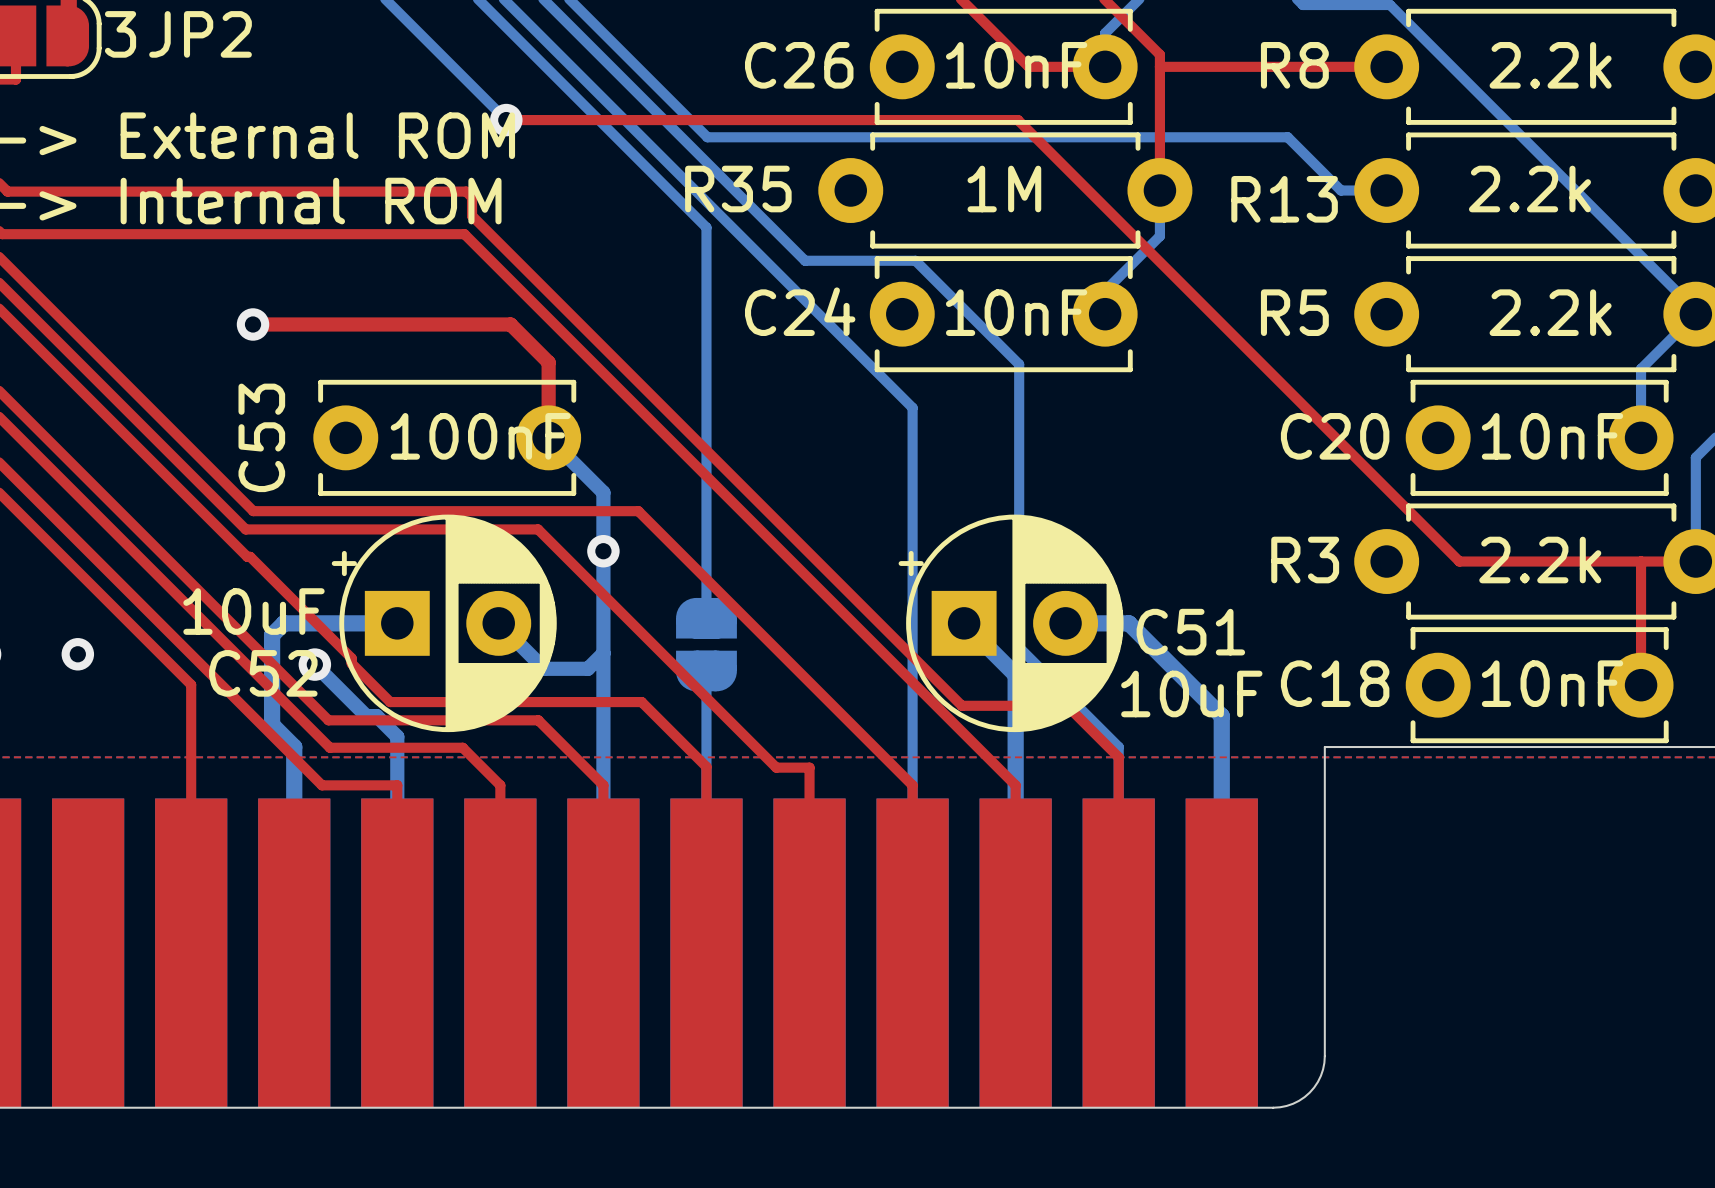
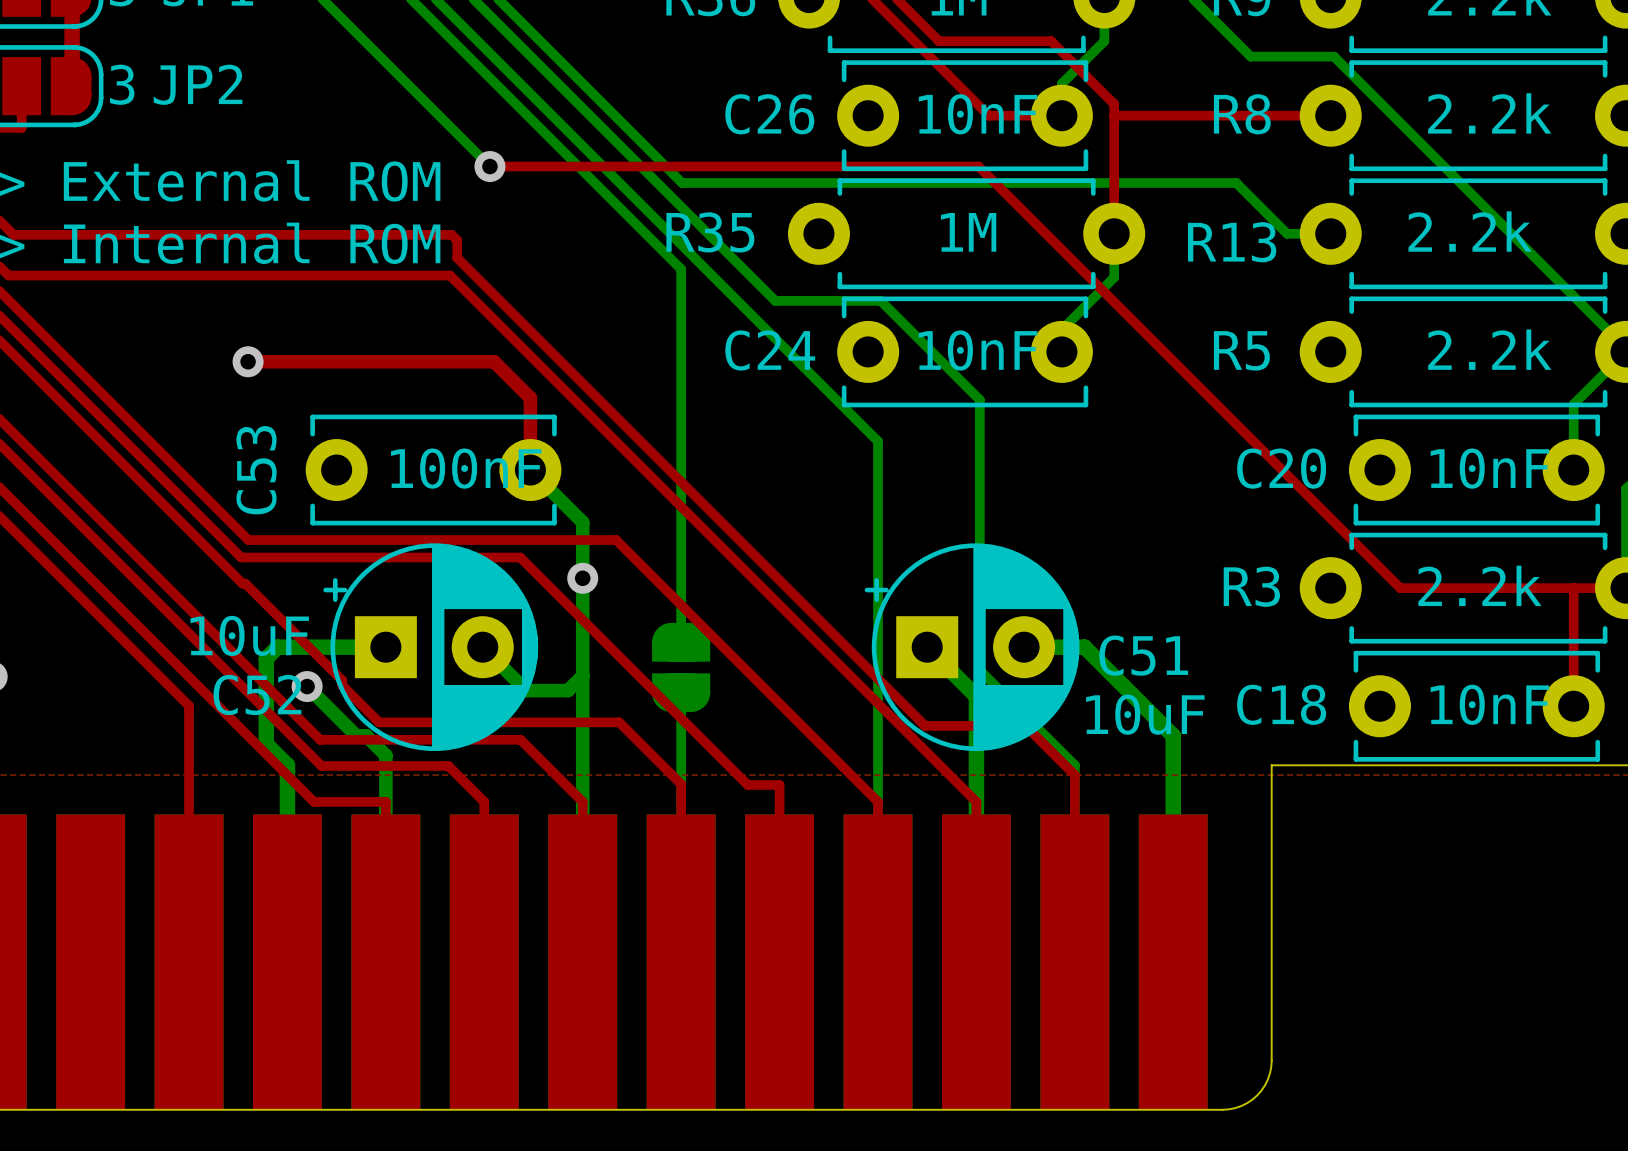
via: (77, 654) -> none

